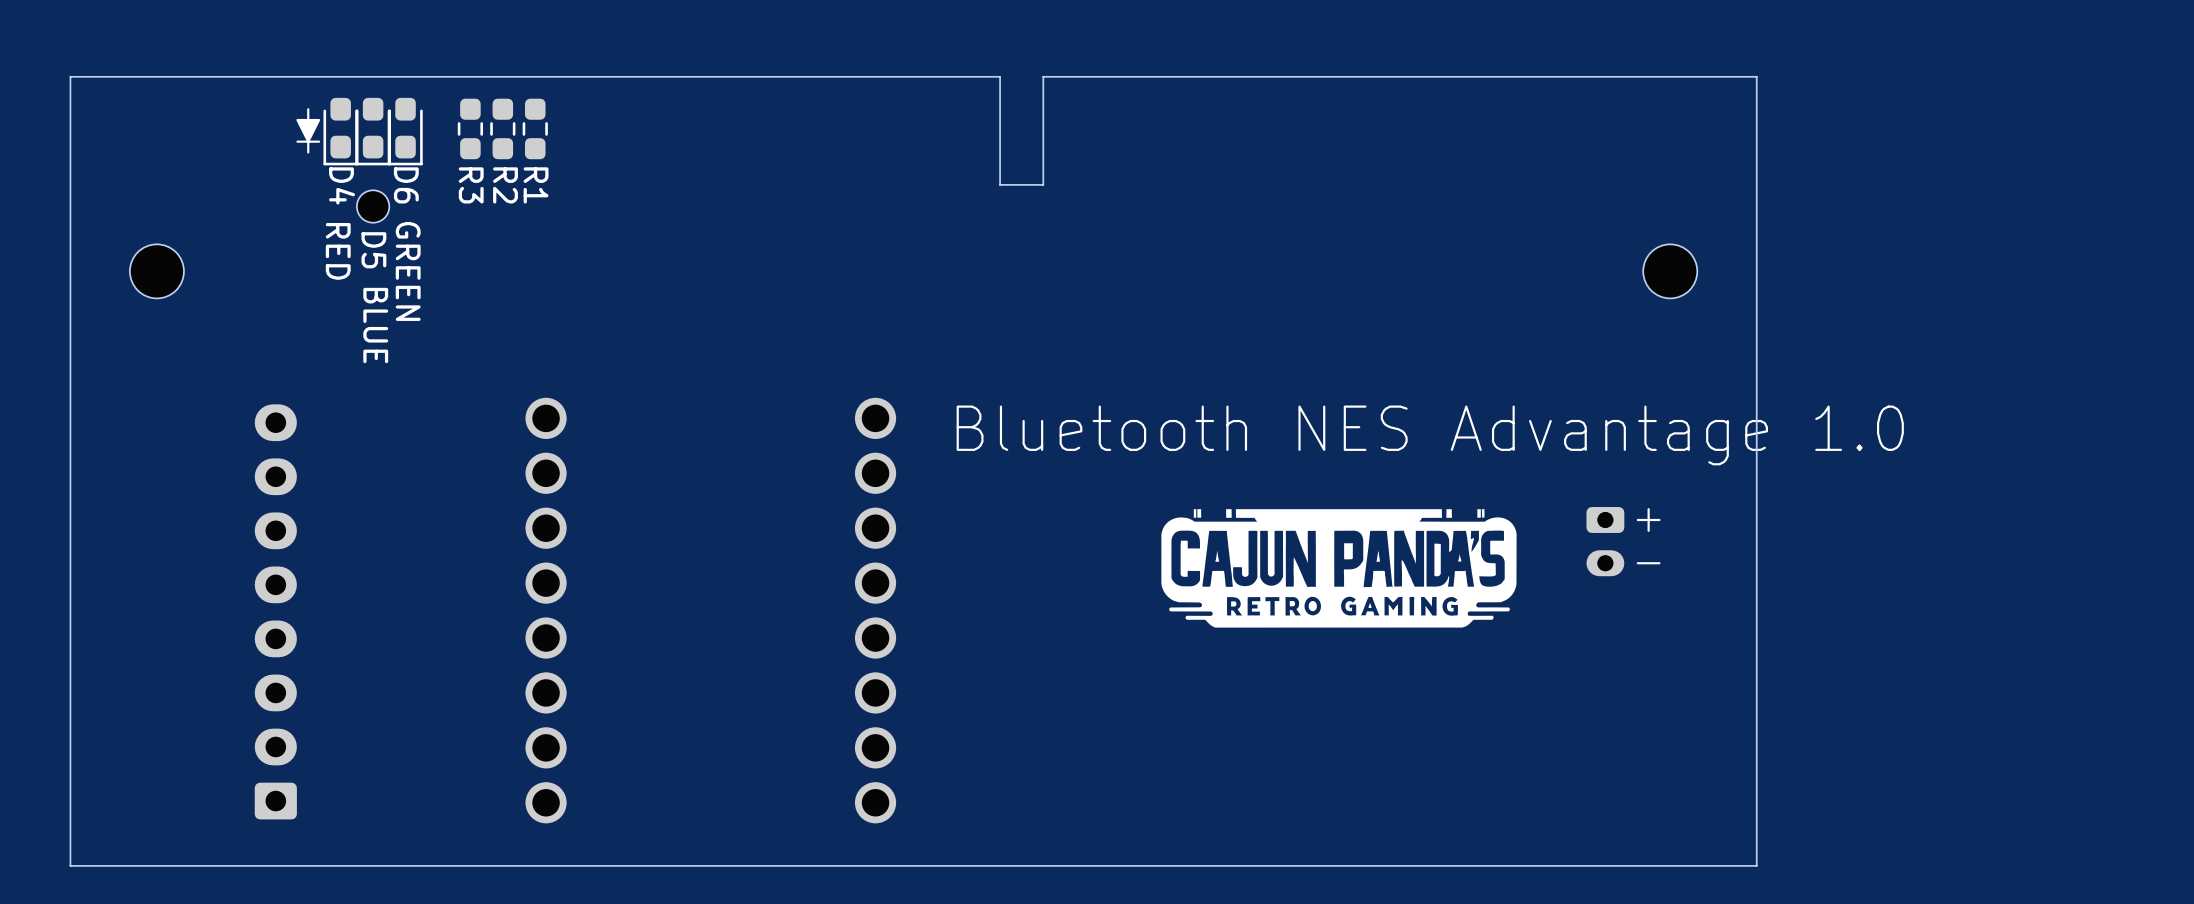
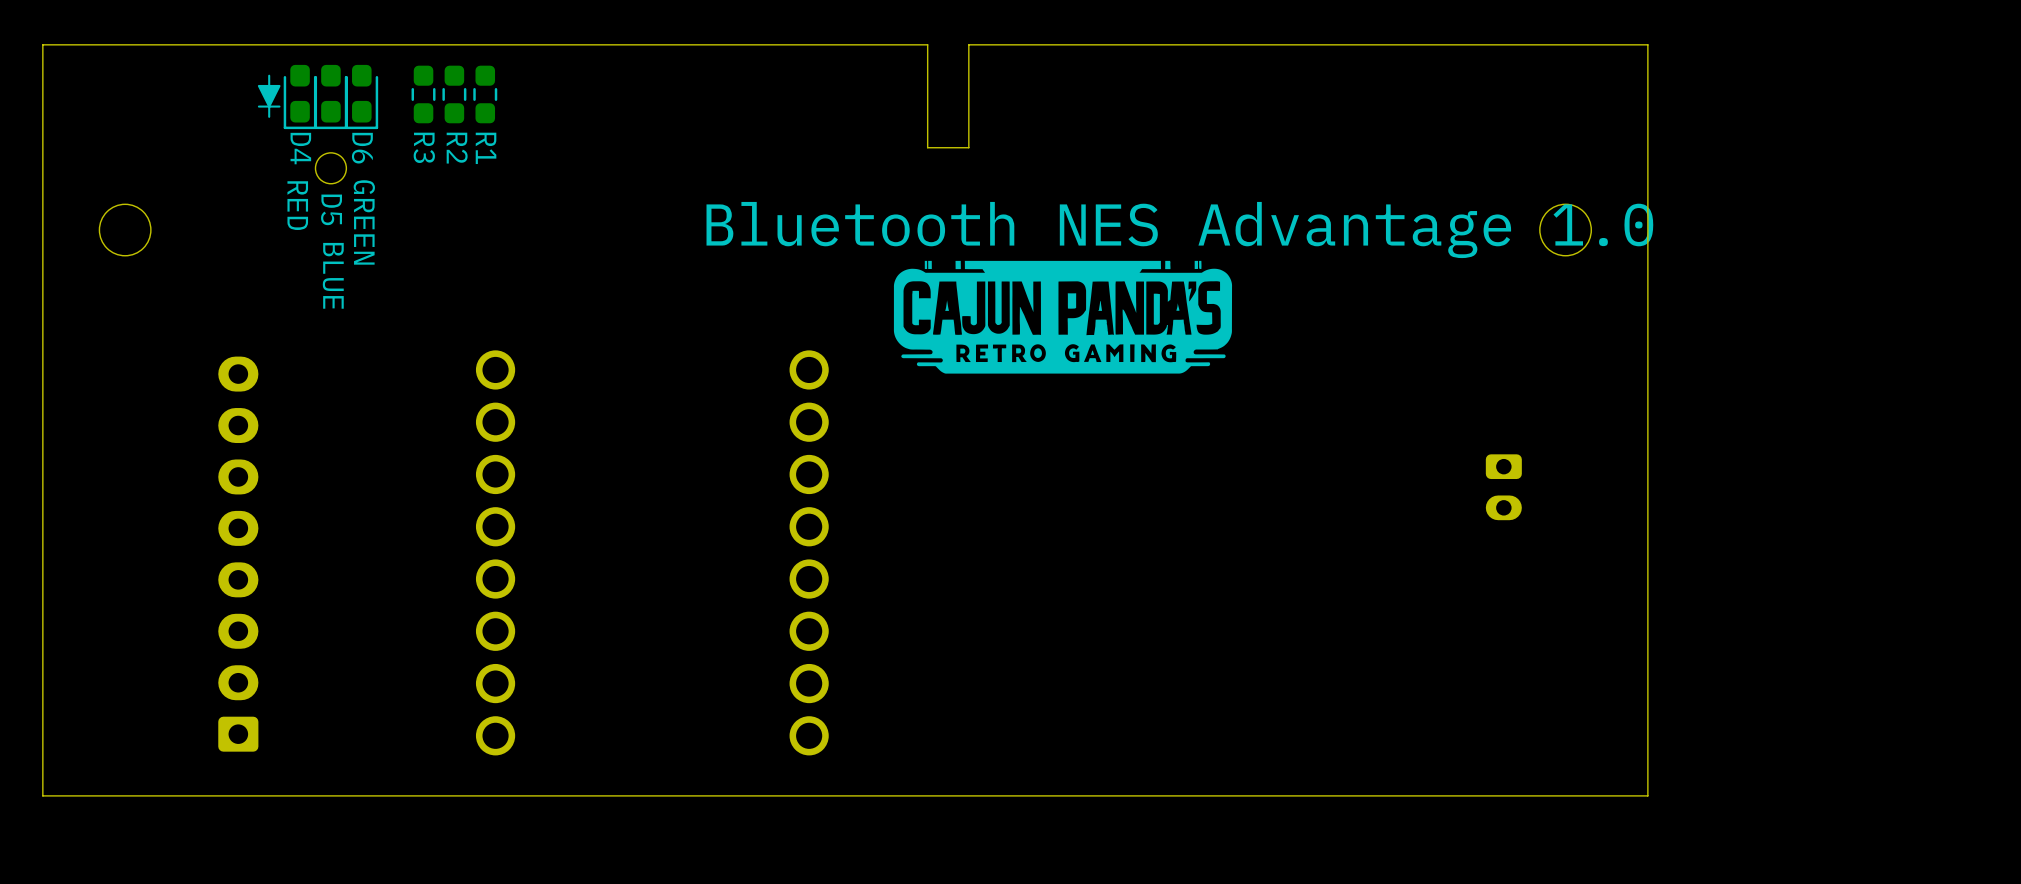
text position: Bluetooth NES Advantage 1.0 (1430, 435) -> Bluetooth NES Advantage 1.0 (1179, 230)
line: (1648, 509) (1648, 530) -> none
drawing position: (1195, 513) -> (925, 264)
drawing position: (1199, 513) -> (930, 264)
drawing position: (1228, 513) -> (958, 264)
drawing position: (1449, 513) -> (1167, 265)
drawing position: (1479, 513) -> (1196, 264)
drawing position: (1483, 513) -> (1200, 264)
line: (1659, 519) (1637, 519) -> none
drawing position: (1348, 551) -> (1071, 300)
drawing position: (1217, 556) -> (947, 305)
drawing position: (1377, 556) -> (1100, 306)
drawing position: (1459, 557) -> (1177, 306)
drawing position: (1437, 559) -> (1156, 309)
line: (1659, 563) (1637, 563) -> none
drawing position: (1338, 568) -> (1062, 317)
drawing position: (1233, 603) -> (962, 351)
drawing position: (1292, 603) -> (1018, 350)
drawing position: (1370, 605) -> (1092, 352)
drawing position: (1312, 606) -> (1038, 353)

